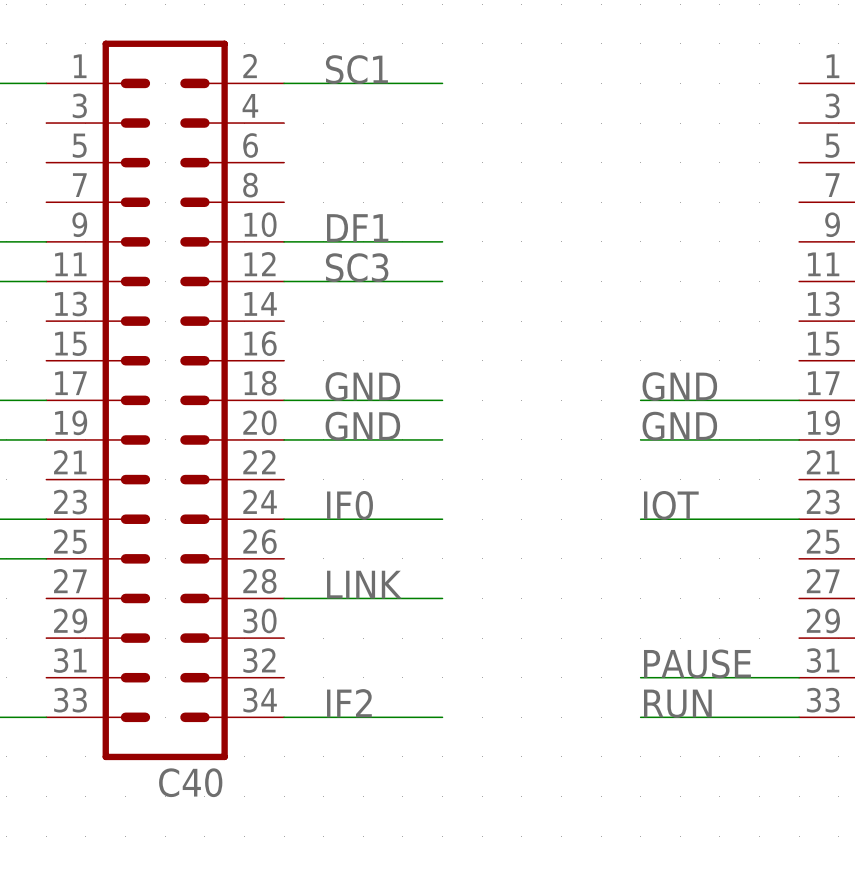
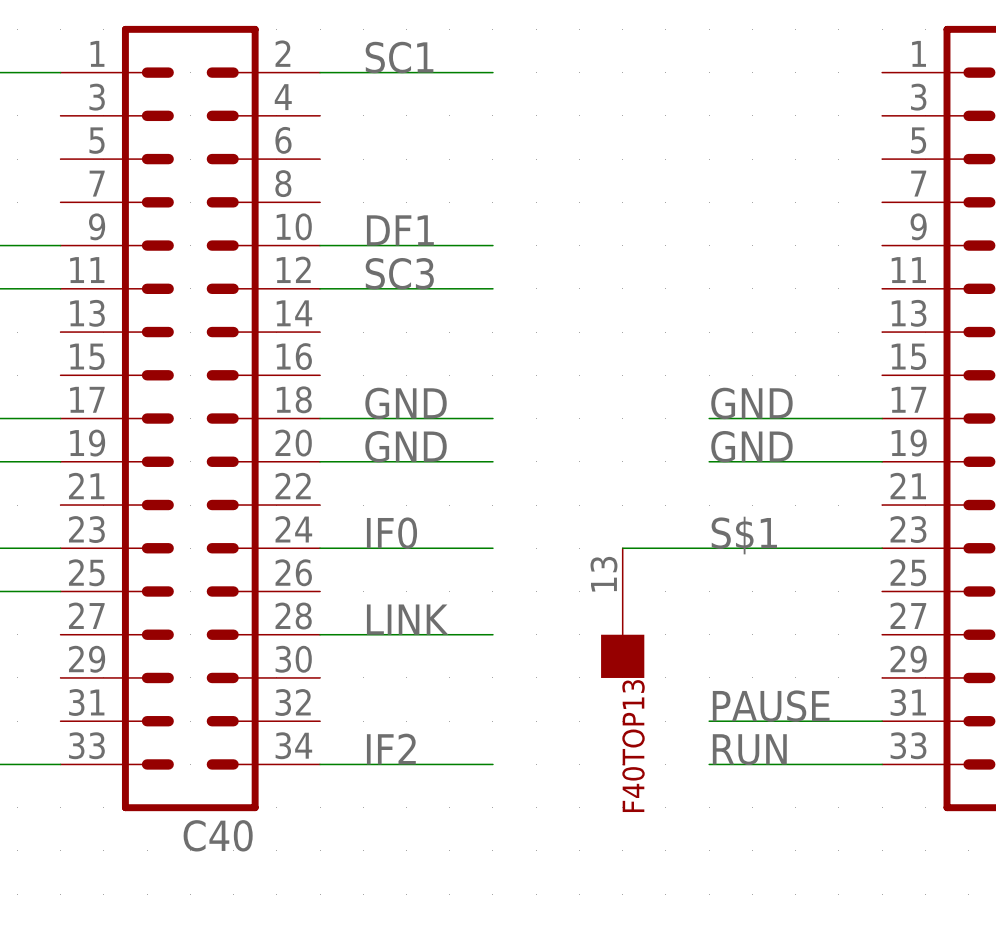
label: IOT (671, 505) -> S$1 (744, 535)
wire: none -> (622, 548) (709, 548)
F40TOP13: none -> (622, 613)

